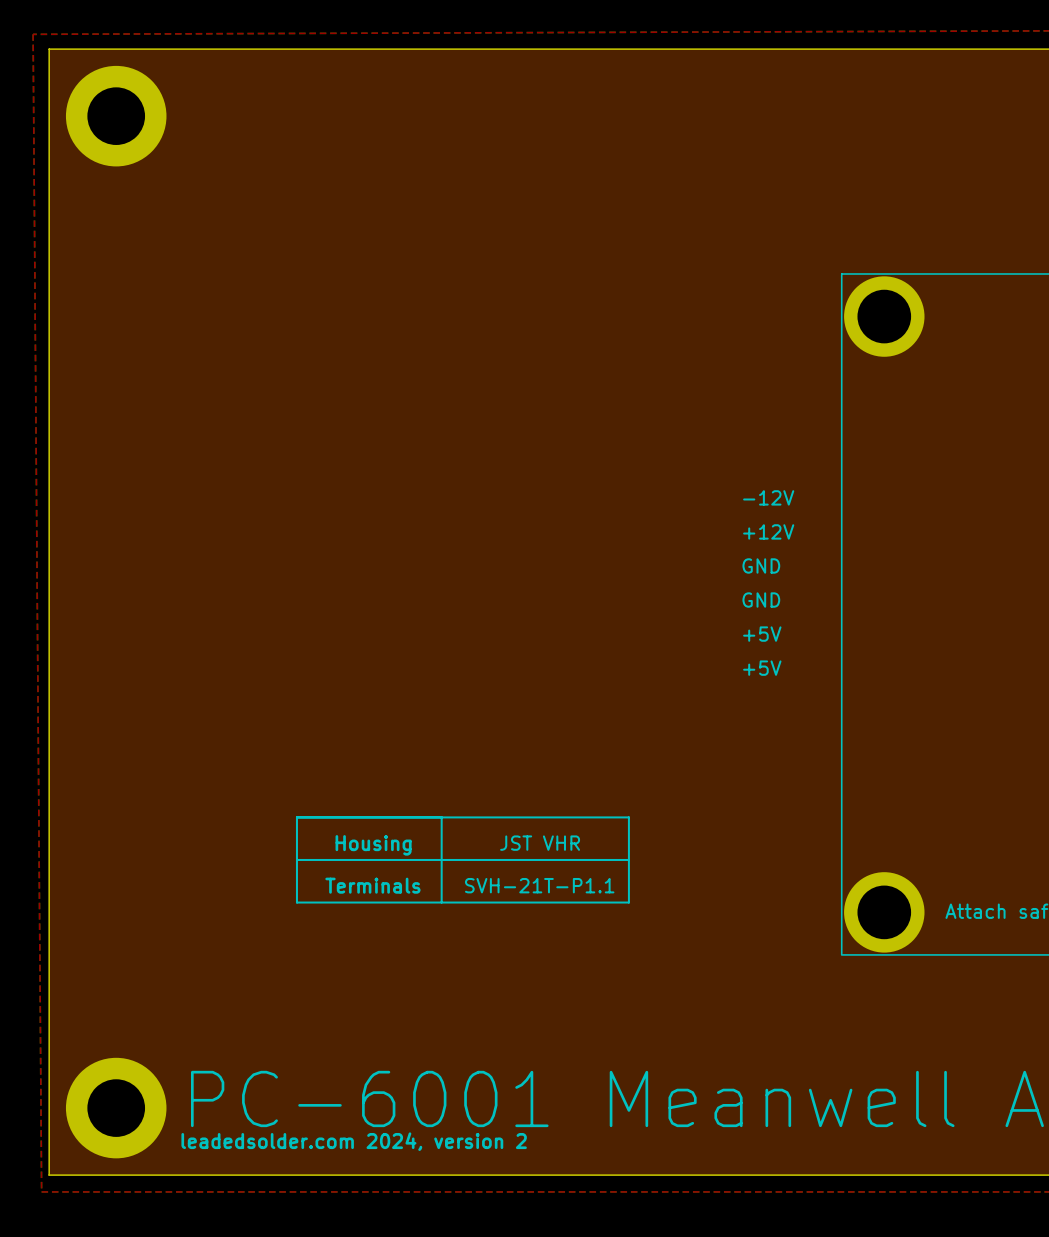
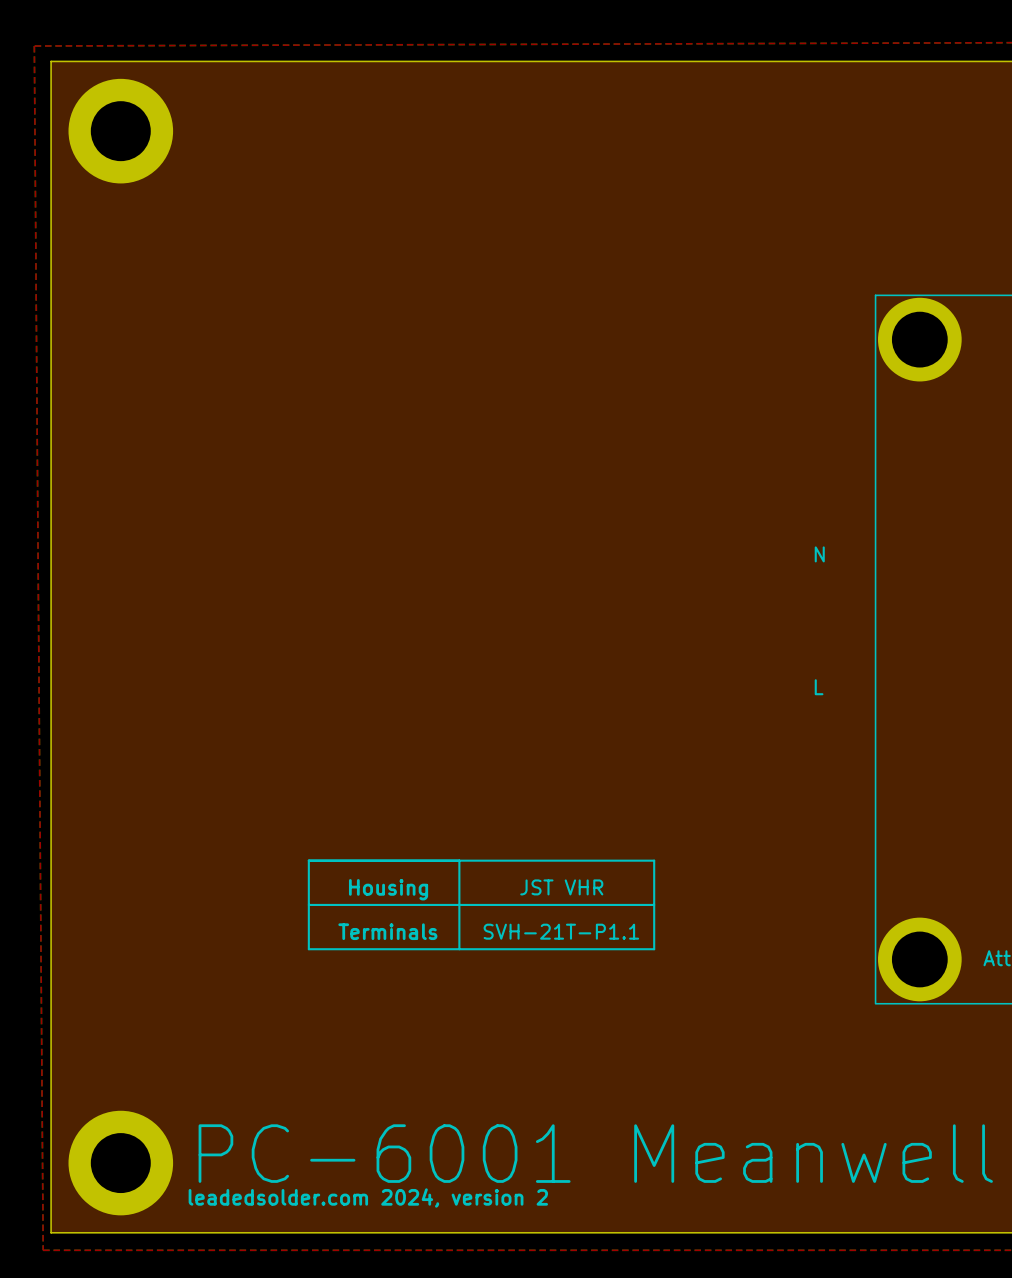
text: -12V (768, 497) -> none
text: none -> N (819, 554)
text: +12V (768, 531) -> none
text: GND (761, 565) -> none
text: GND (761, 600) -> none
text: +5V (762, 634) -> none
text: none -> L (819, 687)
text: +5V (762, 668) -> none

